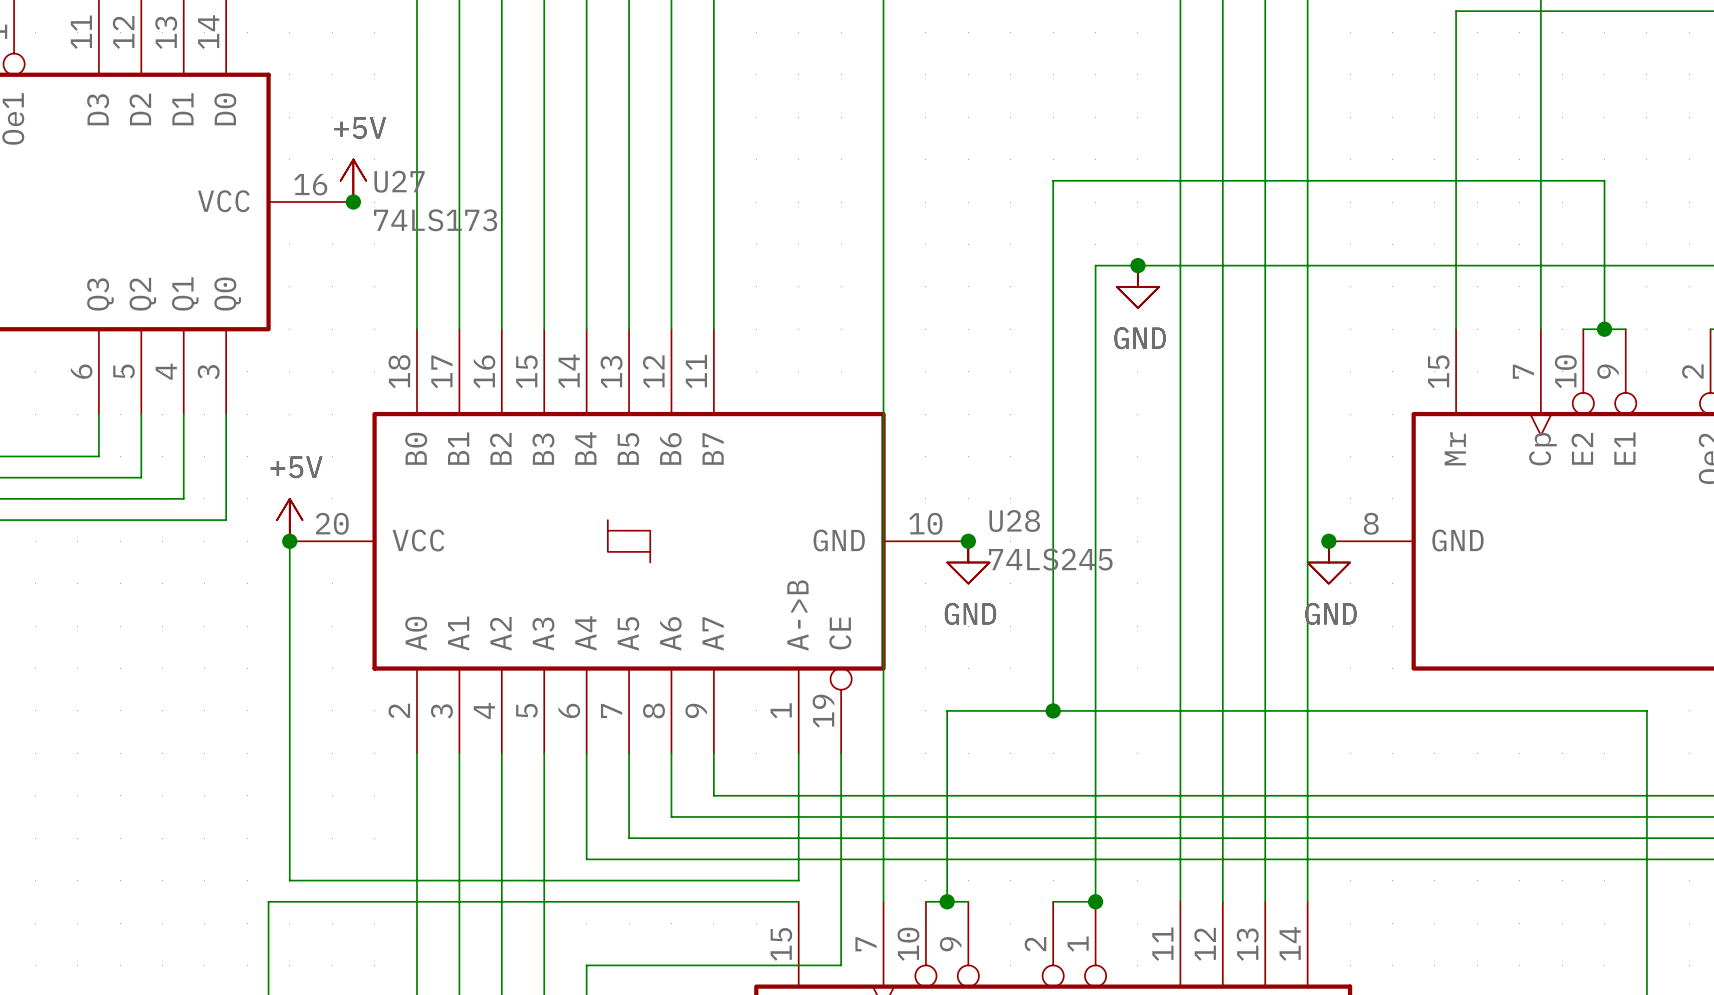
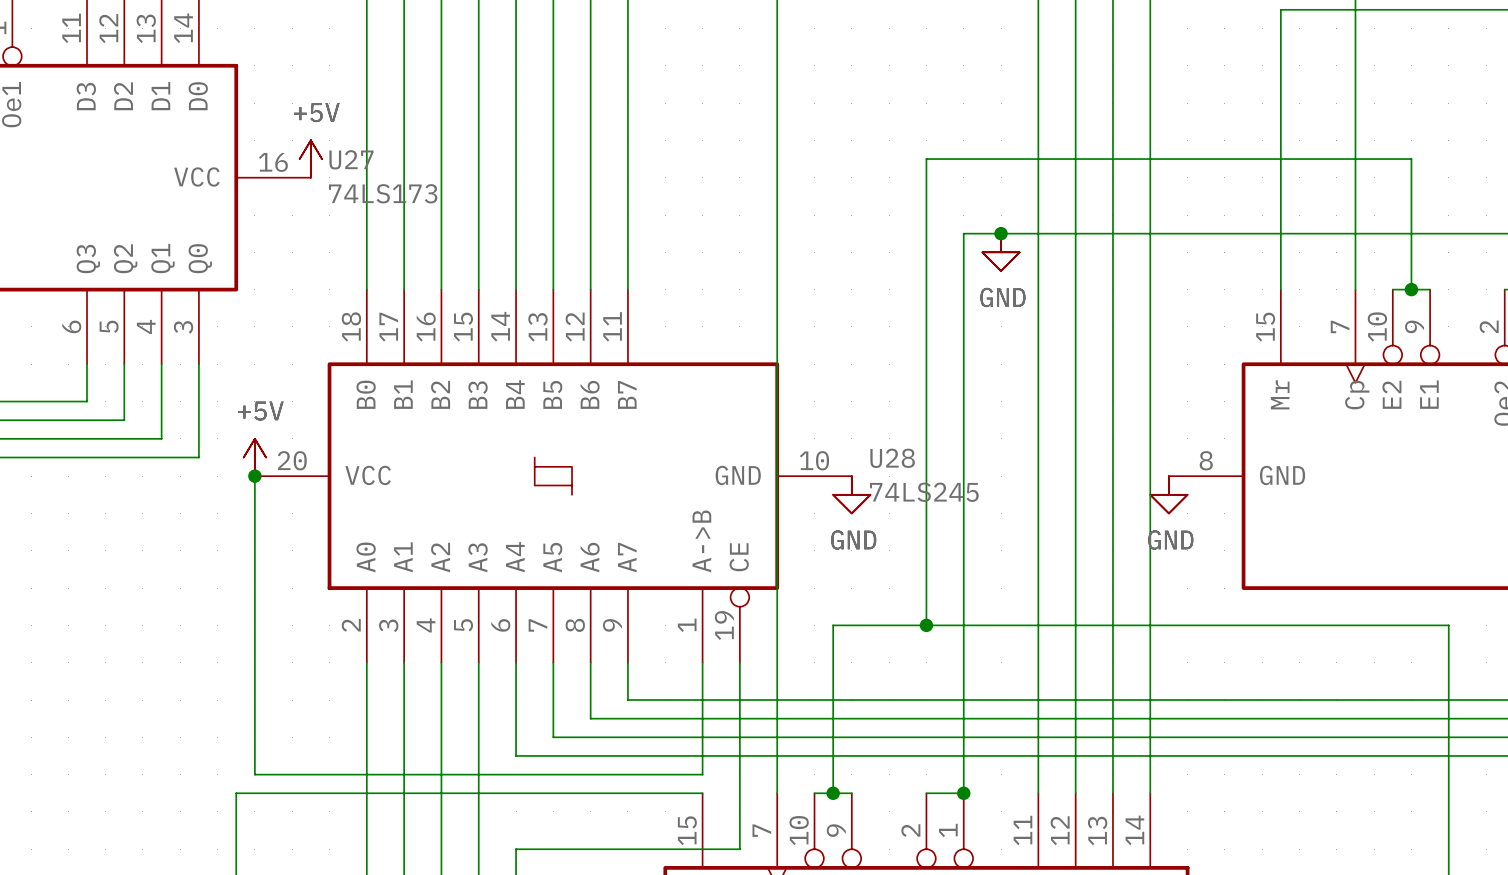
junction: (353, 202) -> none
junction: (968, 541) -> none
junction: (1328, 541) -> none

